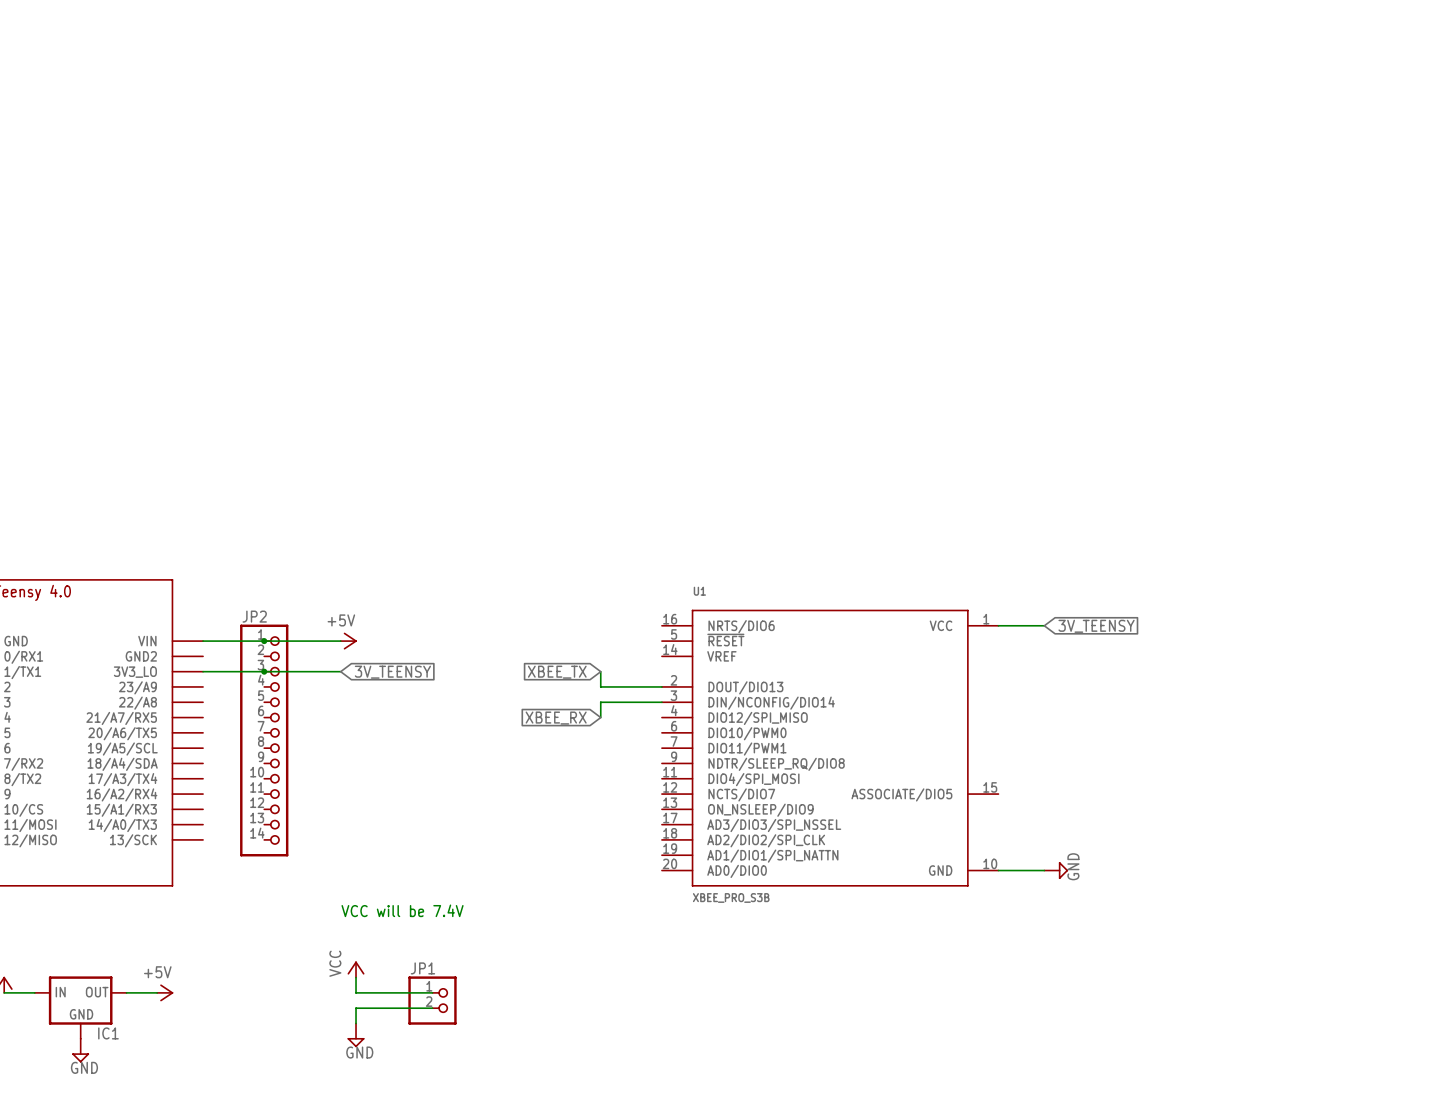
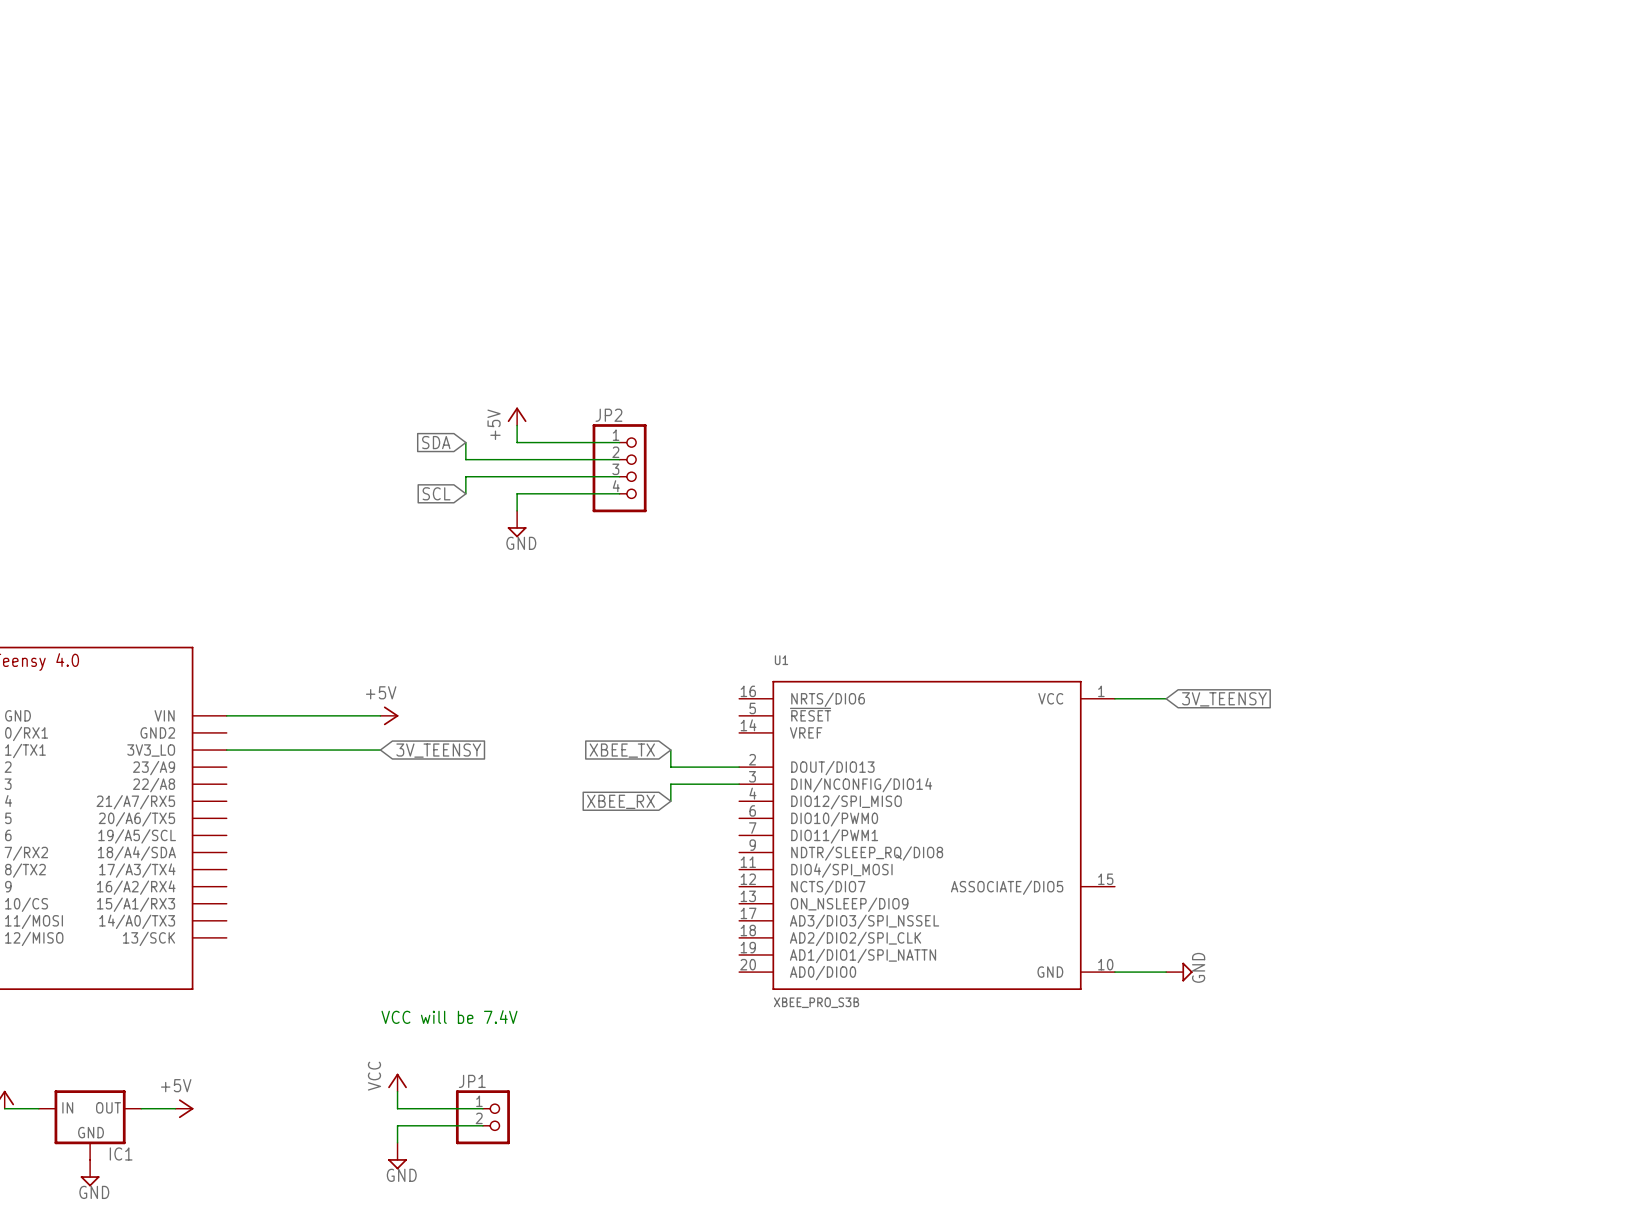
power symbol: none -> +5V (517, 416)
wire: none -> (517, 425) (517, 442) (619, 442)
global label: none -> SDA (436, 442)
wire: none -> (465, 442) (465, 459) (619, 459)
wire: none -> (619, 476) (465, 476) (465, 493)
global label: none -> SCL (436, 493)
wire: none -> (619, 493) (517, 493) (517, 510)
power symbol: none -> GND (517, 524)
JP2 name position: JP2 (254, 616) -> JP2 (608, 415)
JP2 symbol: [240, 624, 289, 857] -> [592, 424, 647, 513]
junction: (264, 641) -> none
junction: (264, 671) -> none

